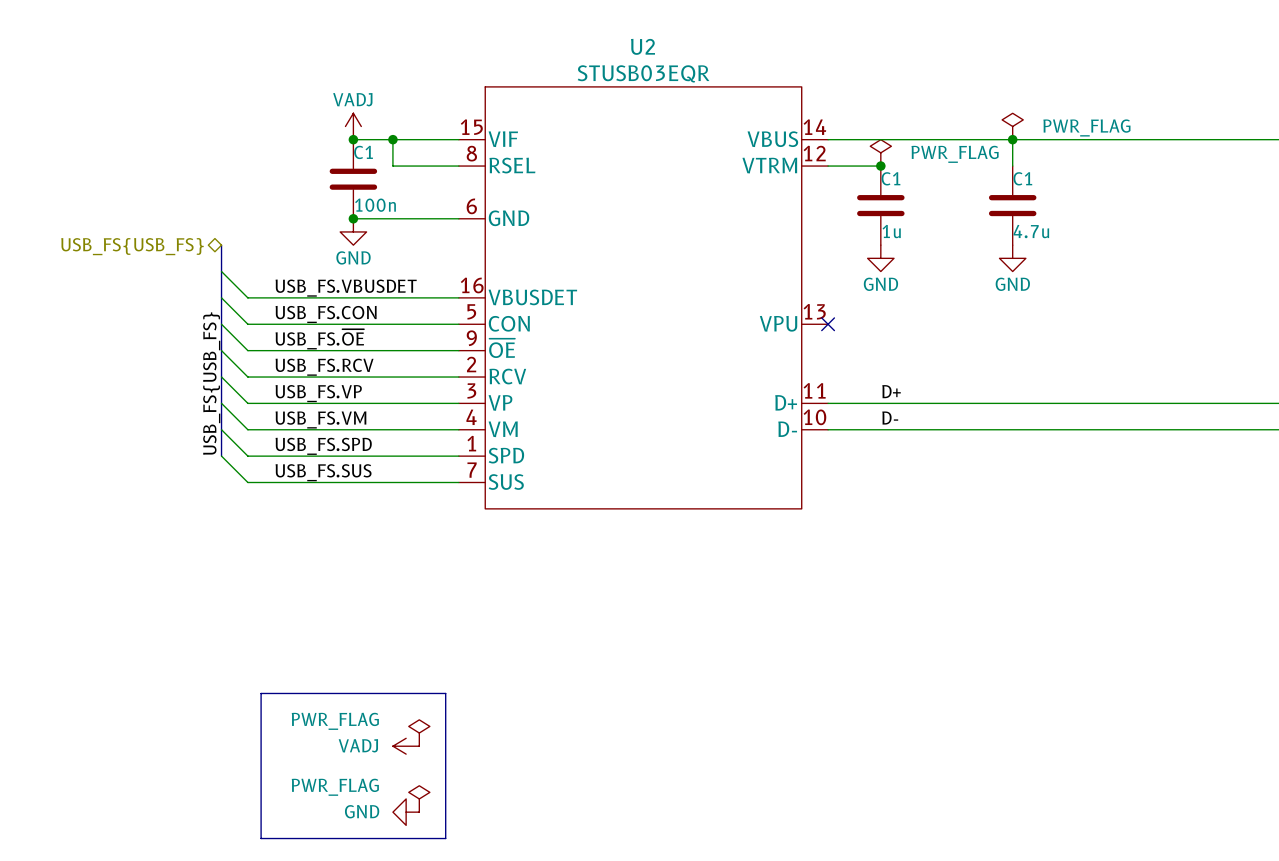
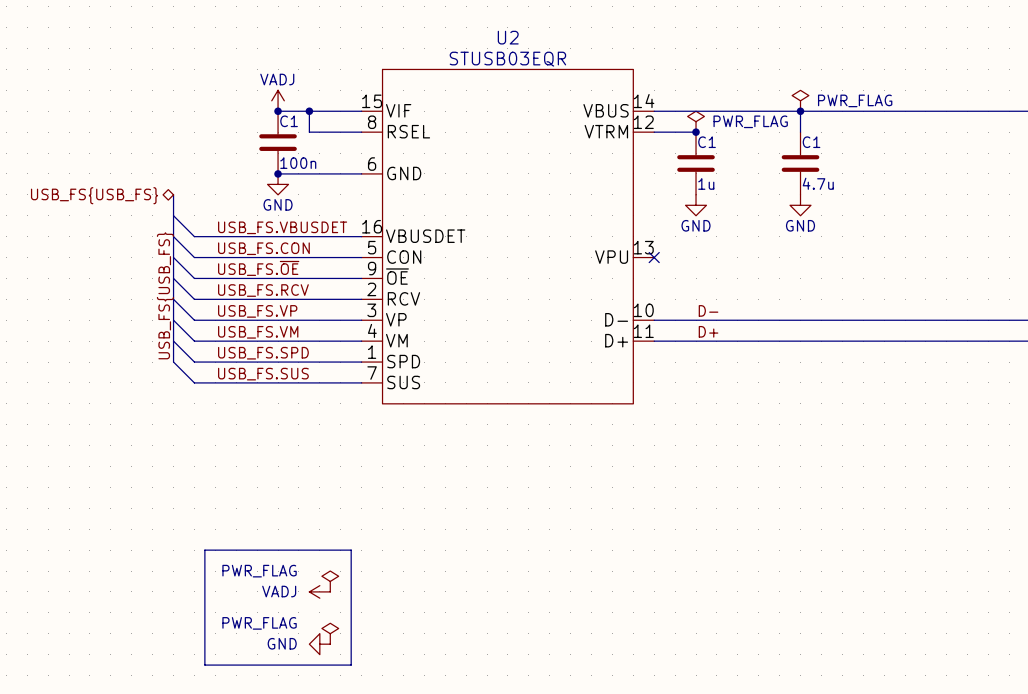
U2 pin number: 11 (814, 390) -> 10 (643, 310)
label: D+ (891, 391) -> D- (708, 310)
U2 pin name: D+ (786, 402) -> D- (616, 319)
U2 pin number: 10 (814, 417) -> 11 (643, 331)
label: D- (890, 418) -> D+ (708, 331)
U2 pin name: D- (787, 429) -> D+ (616, 340)

